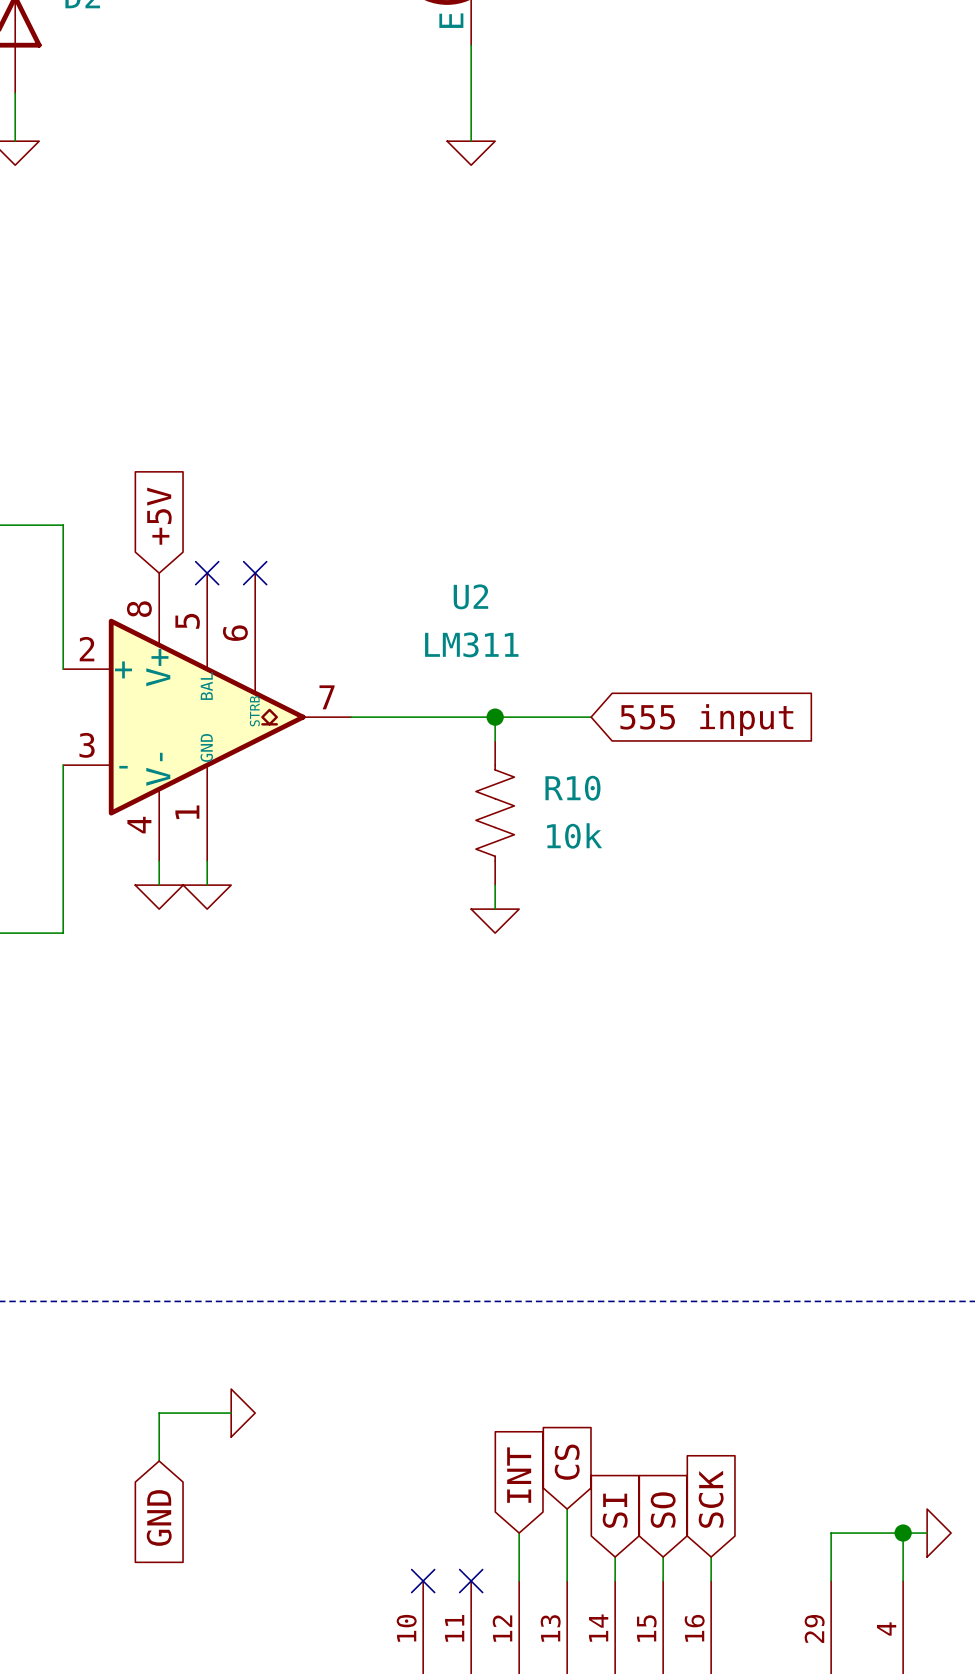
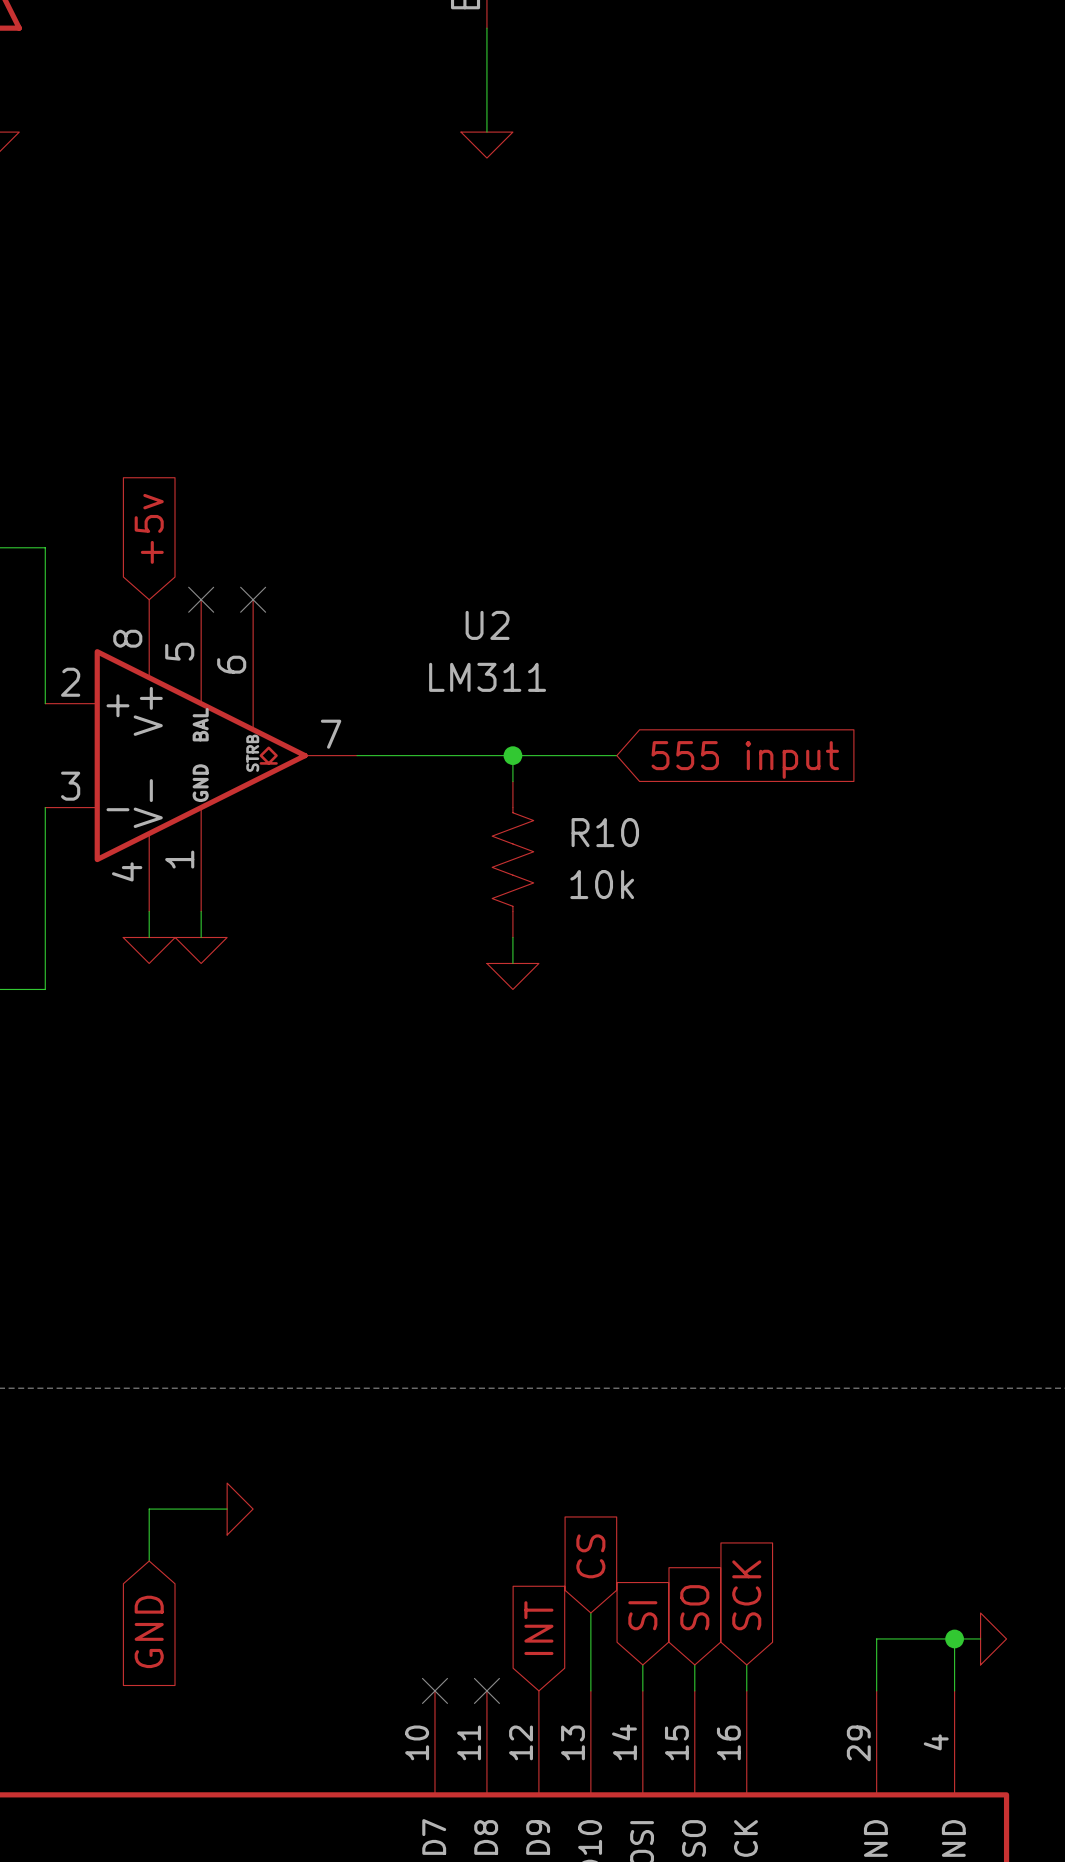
global label: +5V (159, 516) -> +5v (149, 528)
global label position: INT (519, 1475) -> INT (538, 1628)
wire: (519, 1533) (519, 1581) -> none

